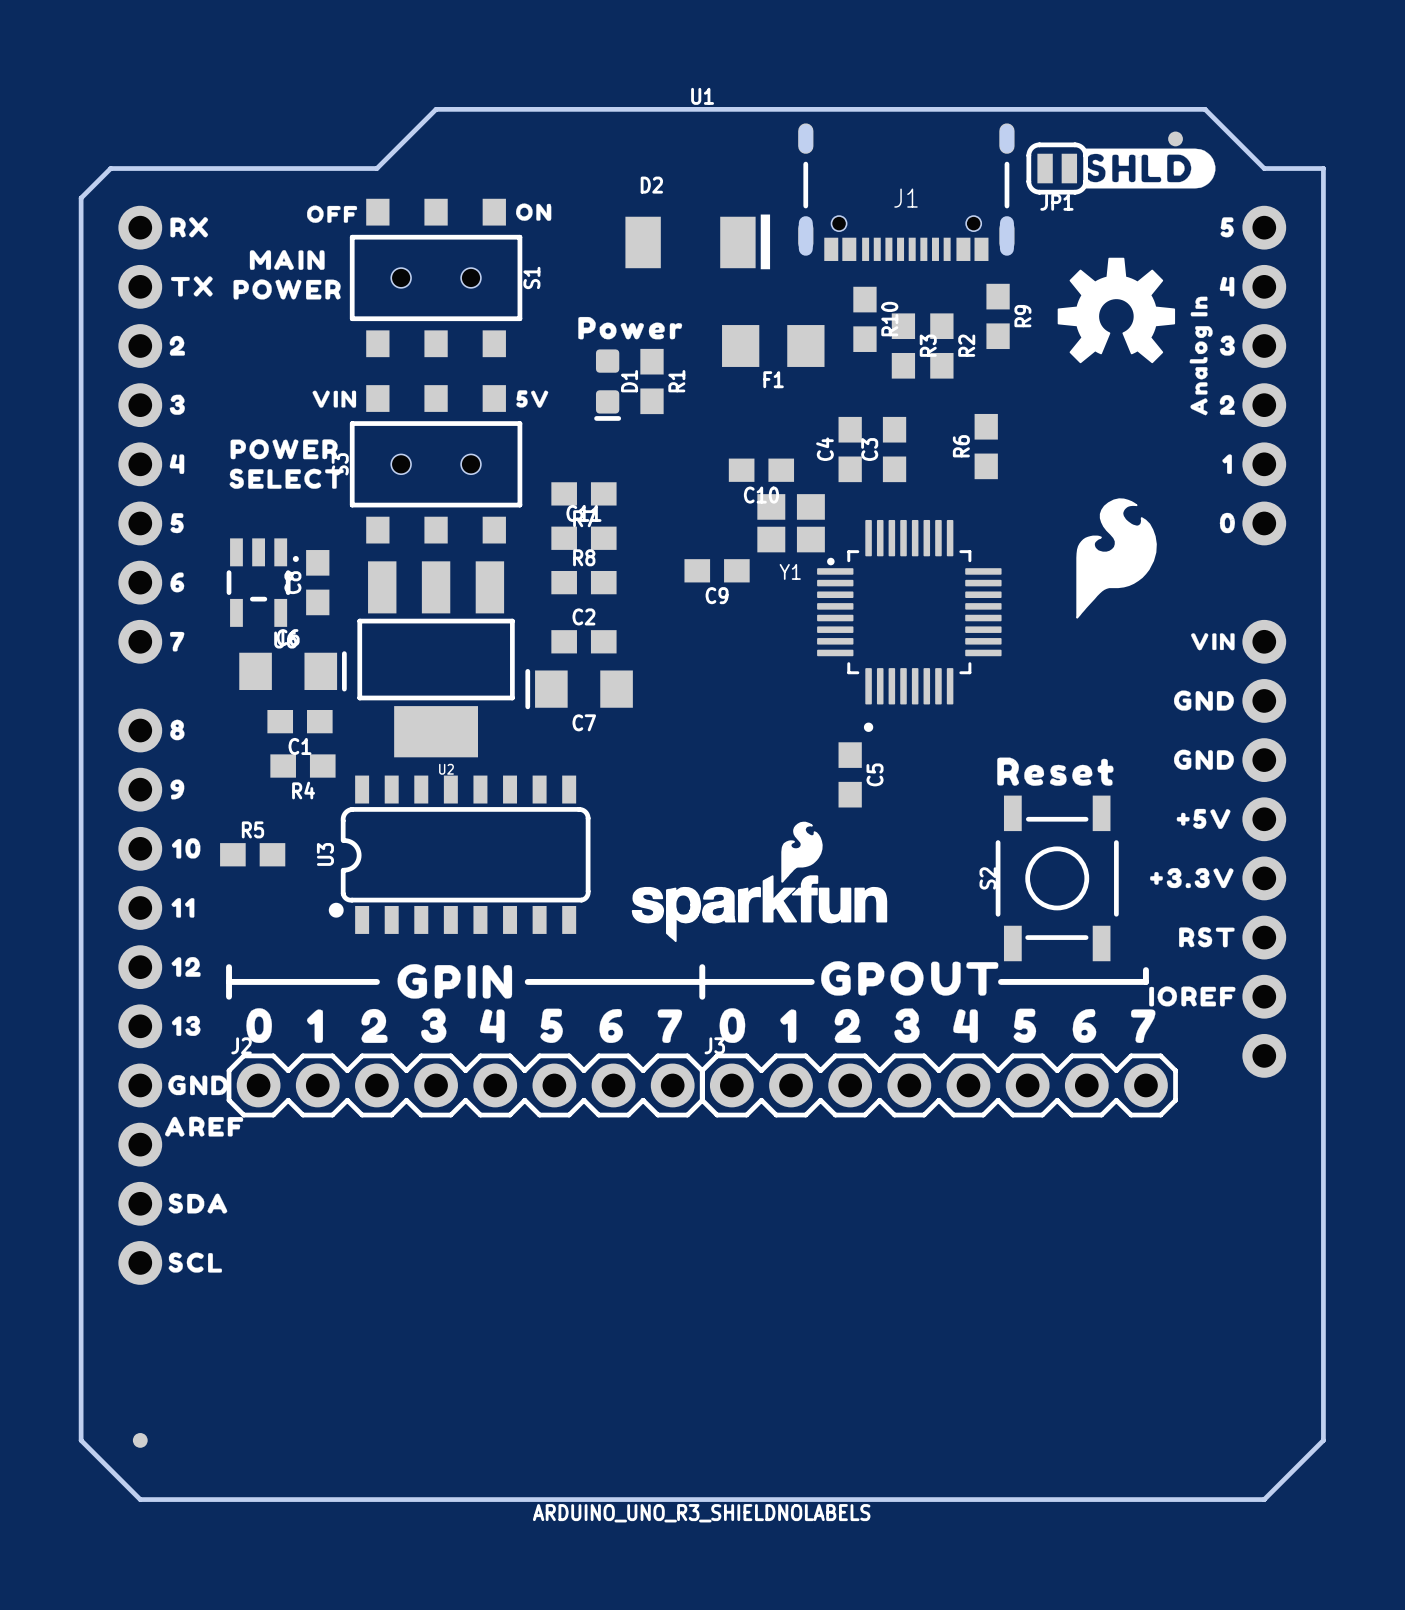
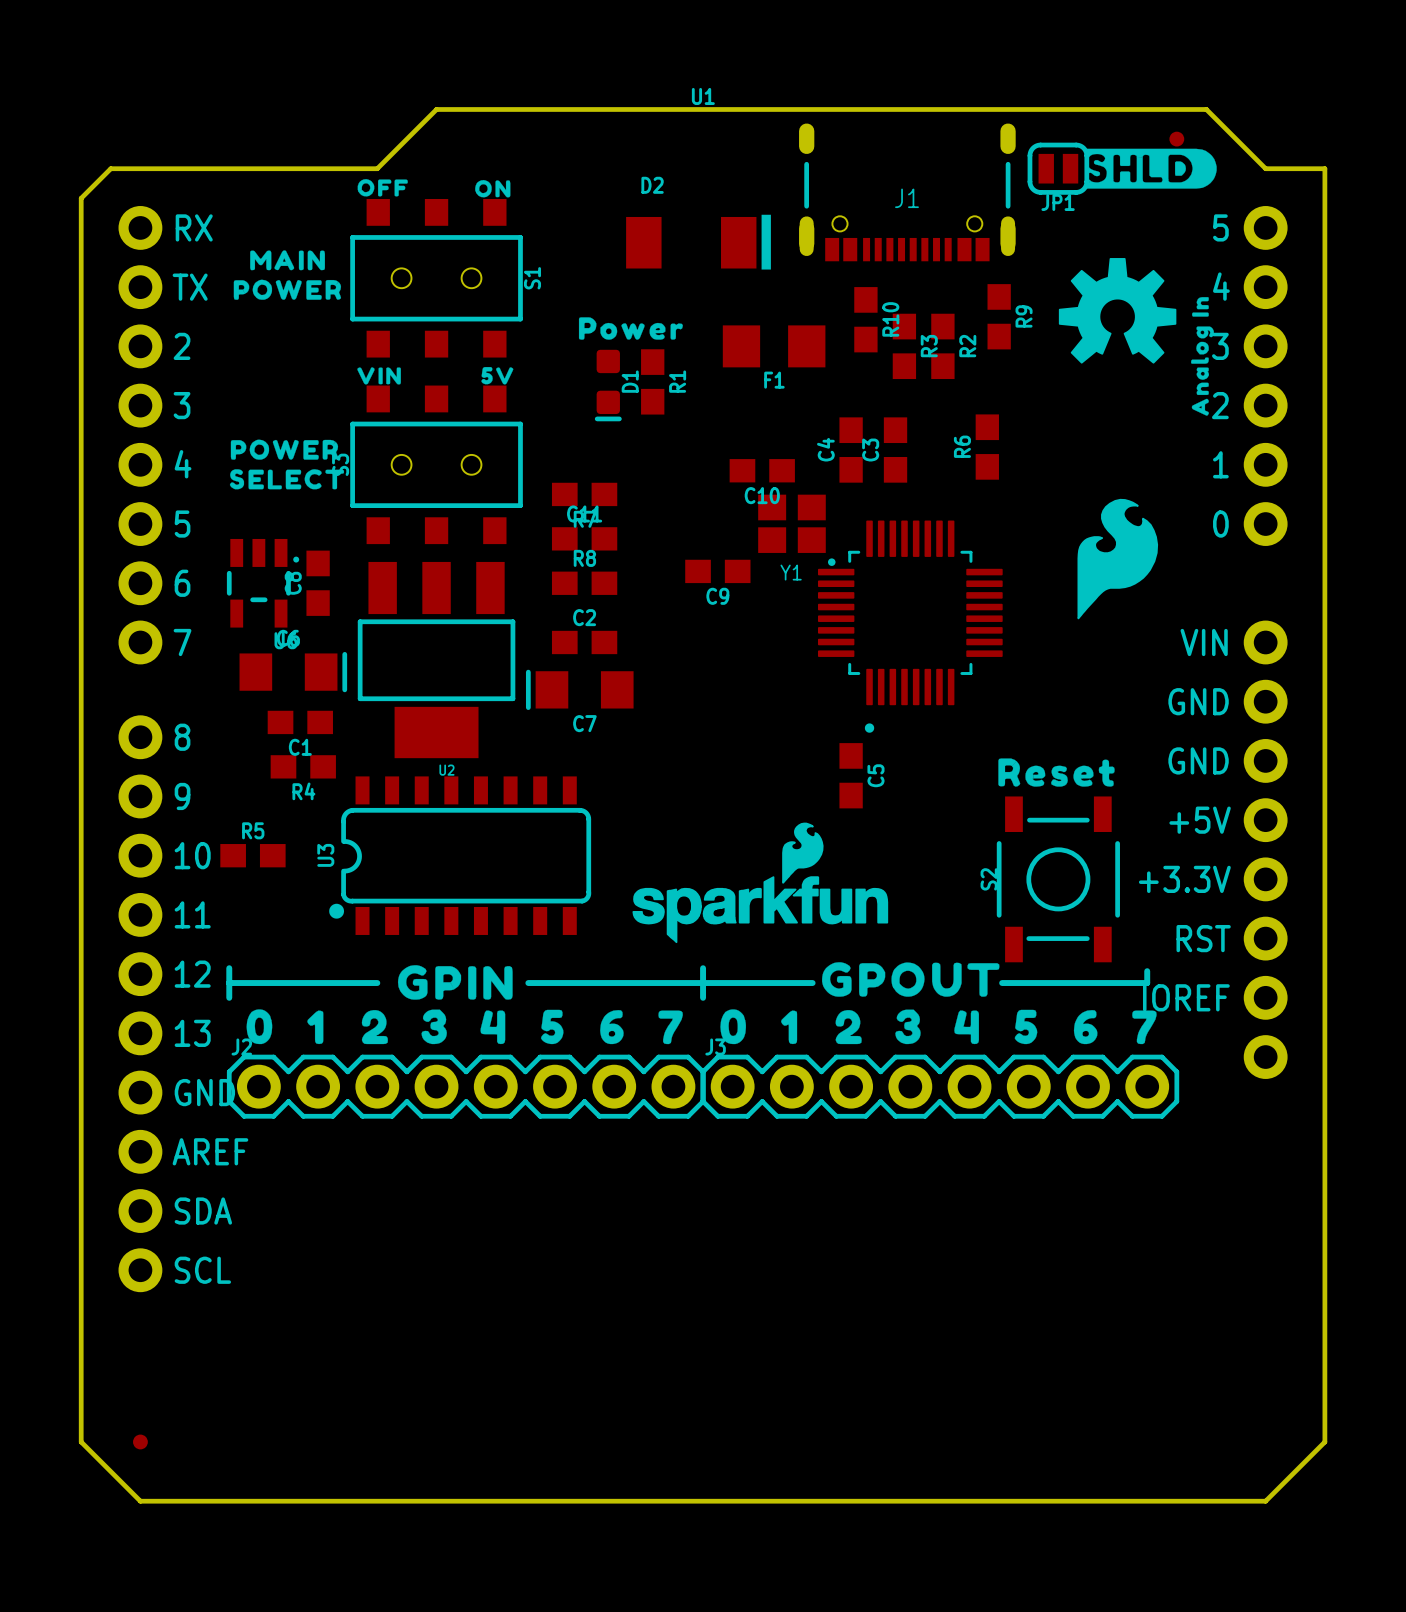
U1 footprint: [118, 205, 1287, 1285] -> [118, 206, 1288, 1293]
drawing position: (533, 212) -> (492, 188)
drawing position: (332, 214) -> (382, 187)
drawing: [170, 217, 209, 238] -> none
drawing: [1220, 217, 1234, 238] -> none
drawing: [171, 276, 213, 297] -> none
drawing: [1219, 276, 1235, 297] -> none
drawing: [169, 335, 185, 356] -> none
drawing: [1219, 335, 1235, 356] -> none
drawing: [169, 394, 185, 415] -> none
drawing: [1219, 395, 1235, 415] -> none
drawing position: (334, 399) -> (379, 375)
drawing position: (532, 399) -> (497, 375)
drawing: [169, 454, 185, 474] -> none
drawing: [1222, 454, 1232, 474] -> none
drawing: [1219, 512, 1235, 534] -> none
drawing: [170, 513, 184, 534] -> none
drawing: [170, 572, 185, 593] -> none
drawing: [170, 631, 185, 652] -> none
drawing: [1191, 633, 1235, 651] -> none
drawing: [1174, 690, 1234, 711] -> none
drawing: [170, 719, 185, 741] -> none
drawing: [1174, 749, 1234, 770] -> none
drawing: [170, 779, 185, 800] -> none
drawing: [1176, 808, 1231, 829] -> none
drawing: [171, 838, 201, 859] -> none
drawing: [1150, 868, 1234, 889] -> none
drawing: [171, 898, 195, 918] -> none
drawing: [1179, 927, 1235, 948] -> none
drawing: [171, 957, 201, 977] -> none
drawing: [1149, 986, 1236, 1007] -> none
drawing: [171, 1015, 201, 1036] -> none
drawing: [164, 1075, 244, 1137] -> none
drawing: [168, 1193, 228, 1214] -> none
drawing: [168, 1252, 222, 1273] -> none
U1 value: ARDUINO_UNO_R3_SHIELDNOLABELS (701, 1513) -> none

